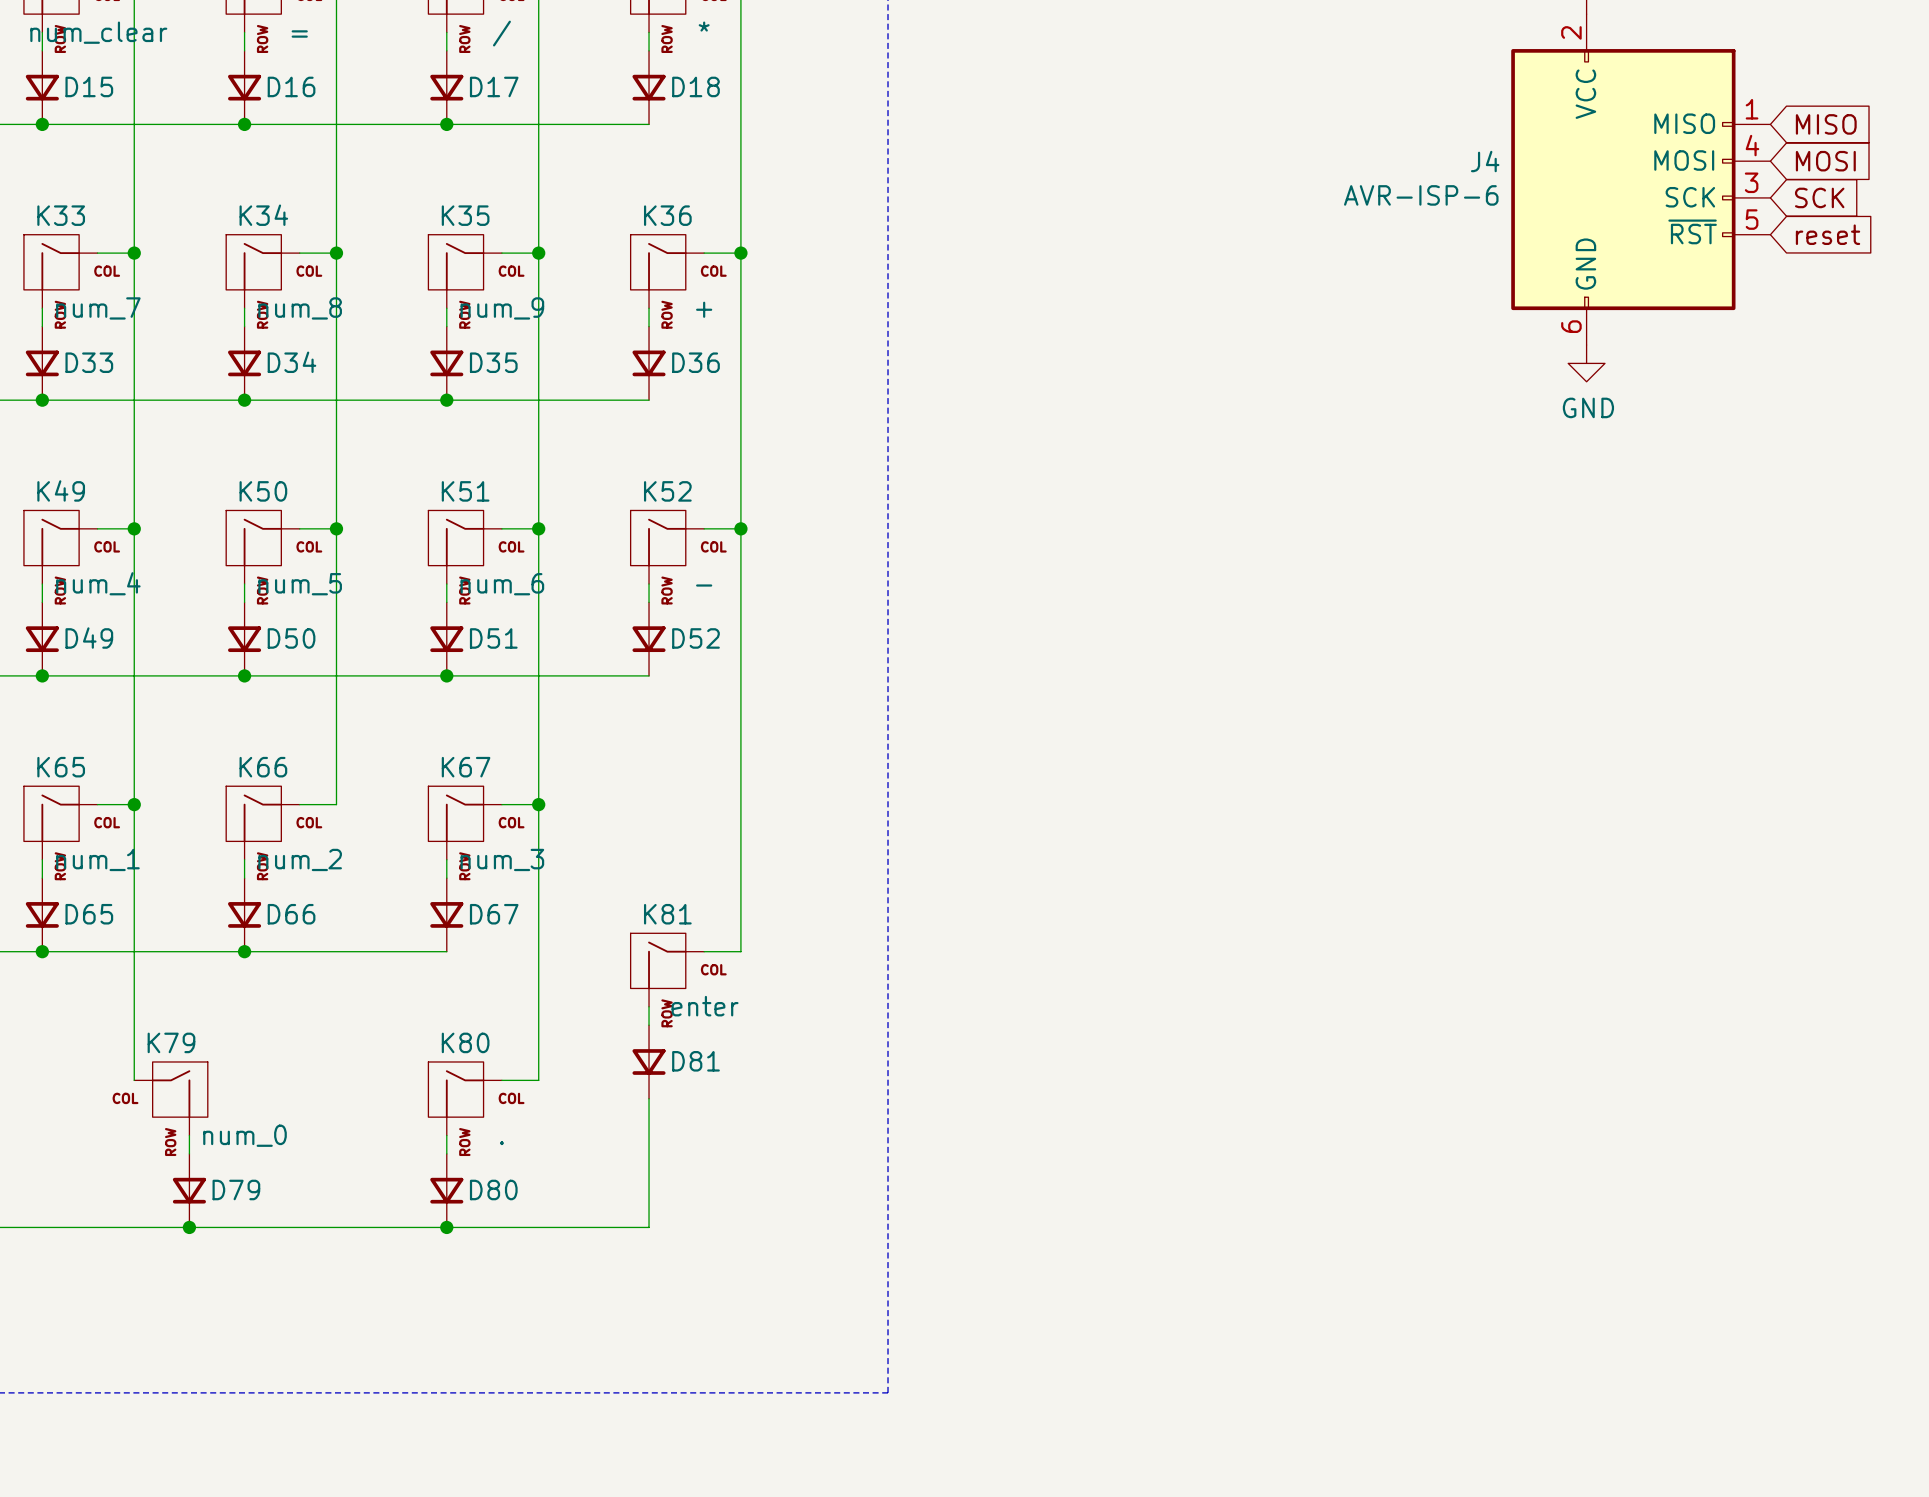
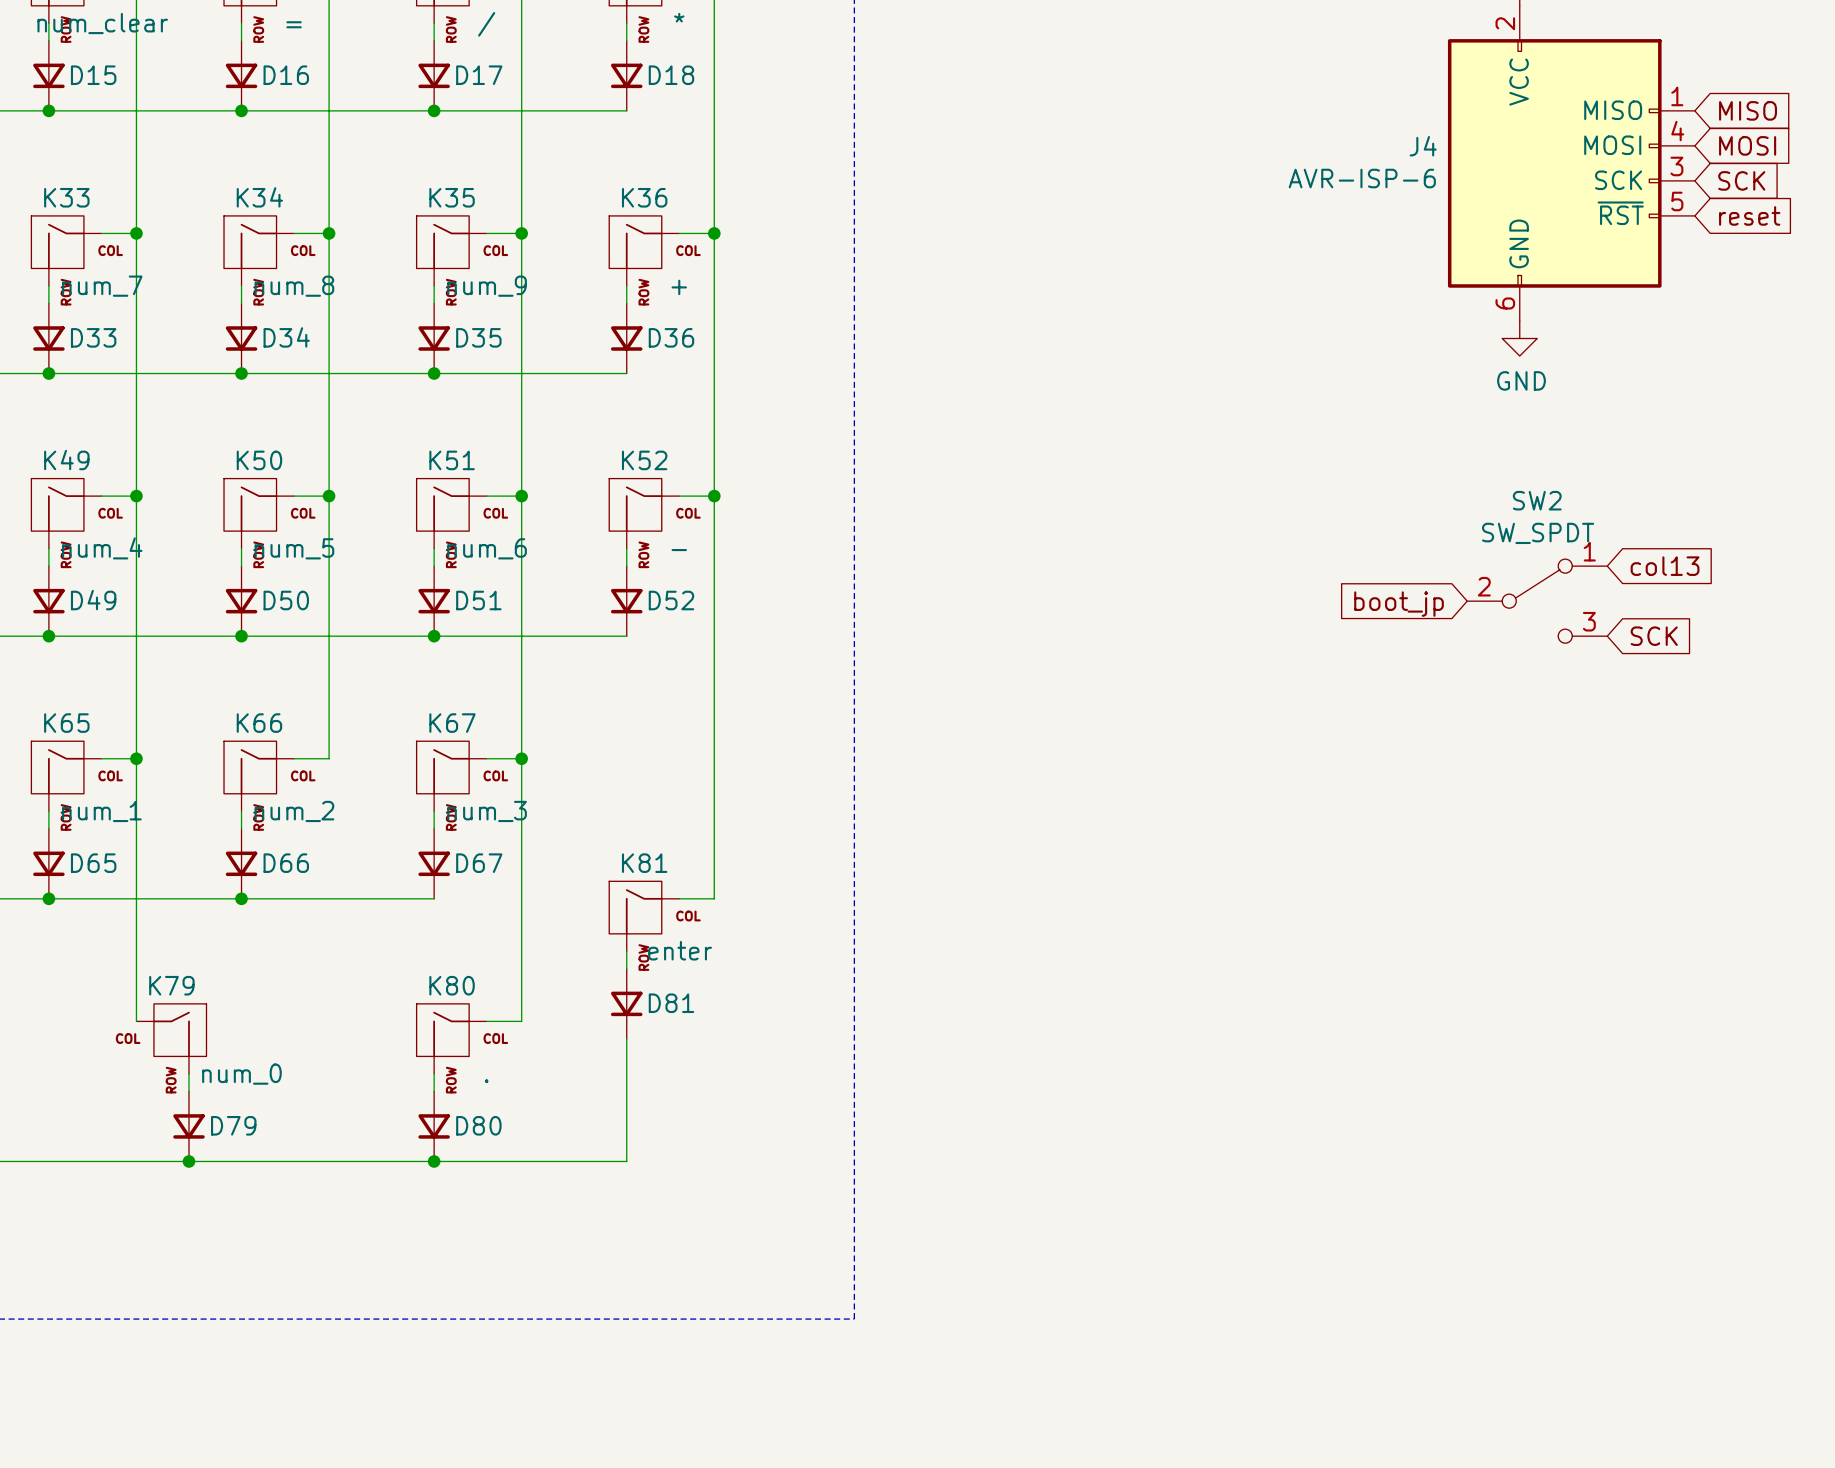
global label: none -> col13 (1665, 566)
SW2: none -> SW_SPDT (1537, 601)
global label: none -> boot_jp (1399, 604)
global label: none -> SCK (1654, 636)

